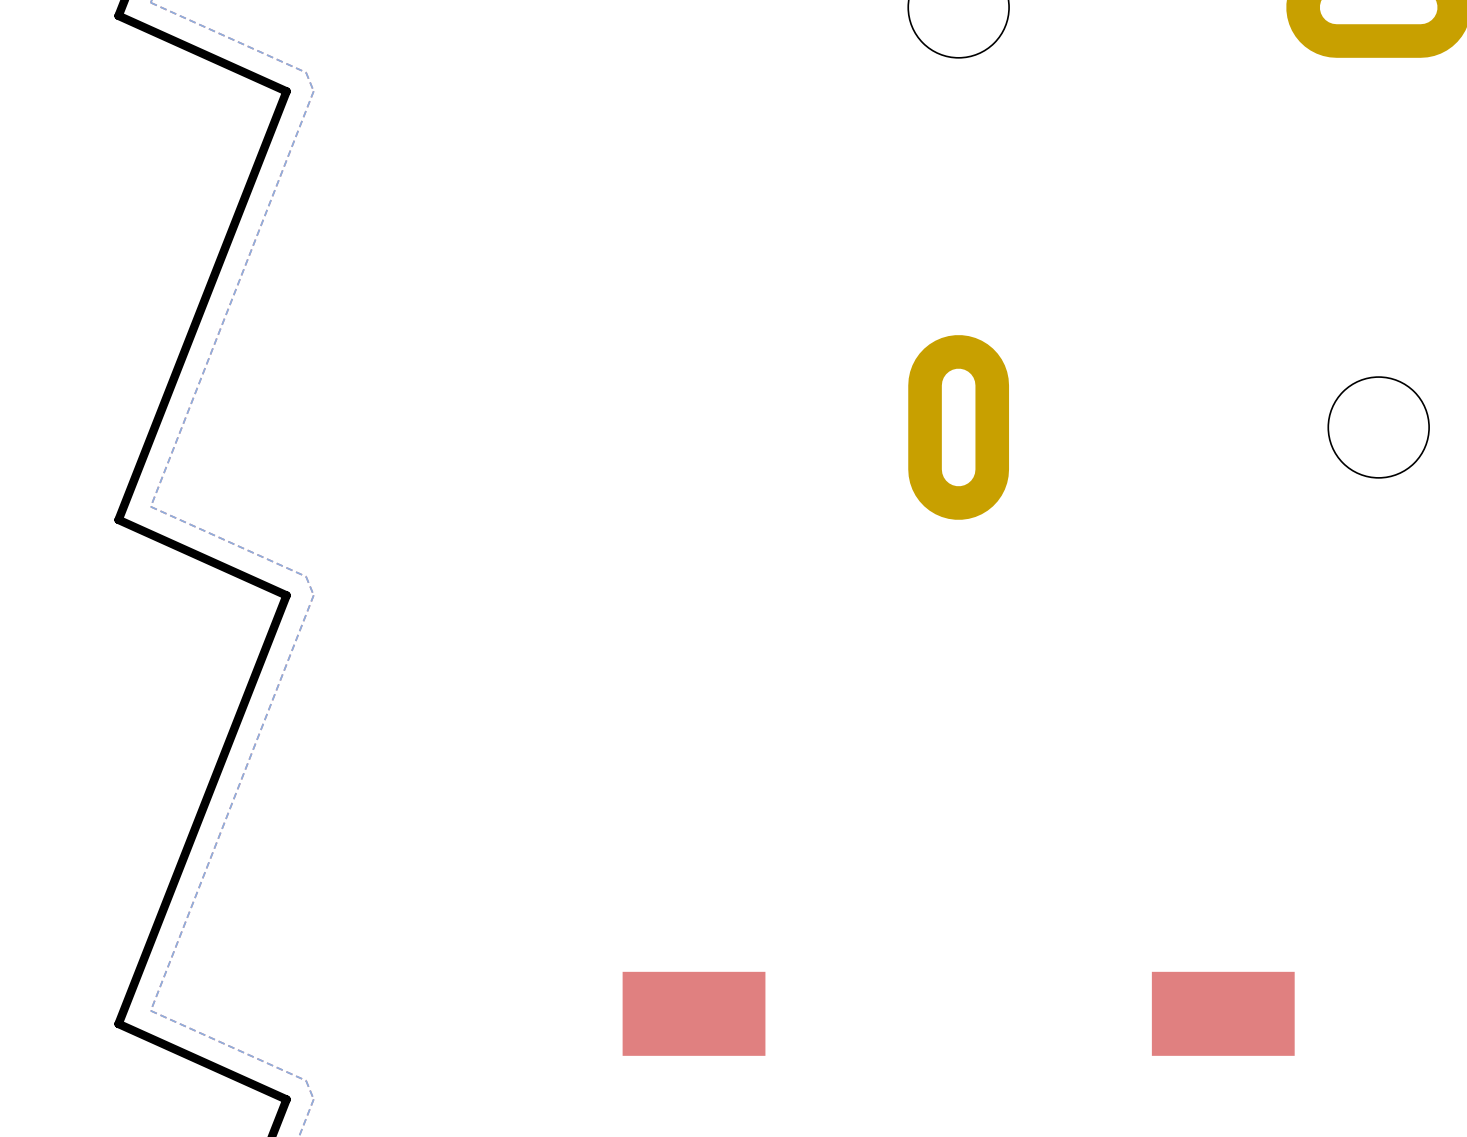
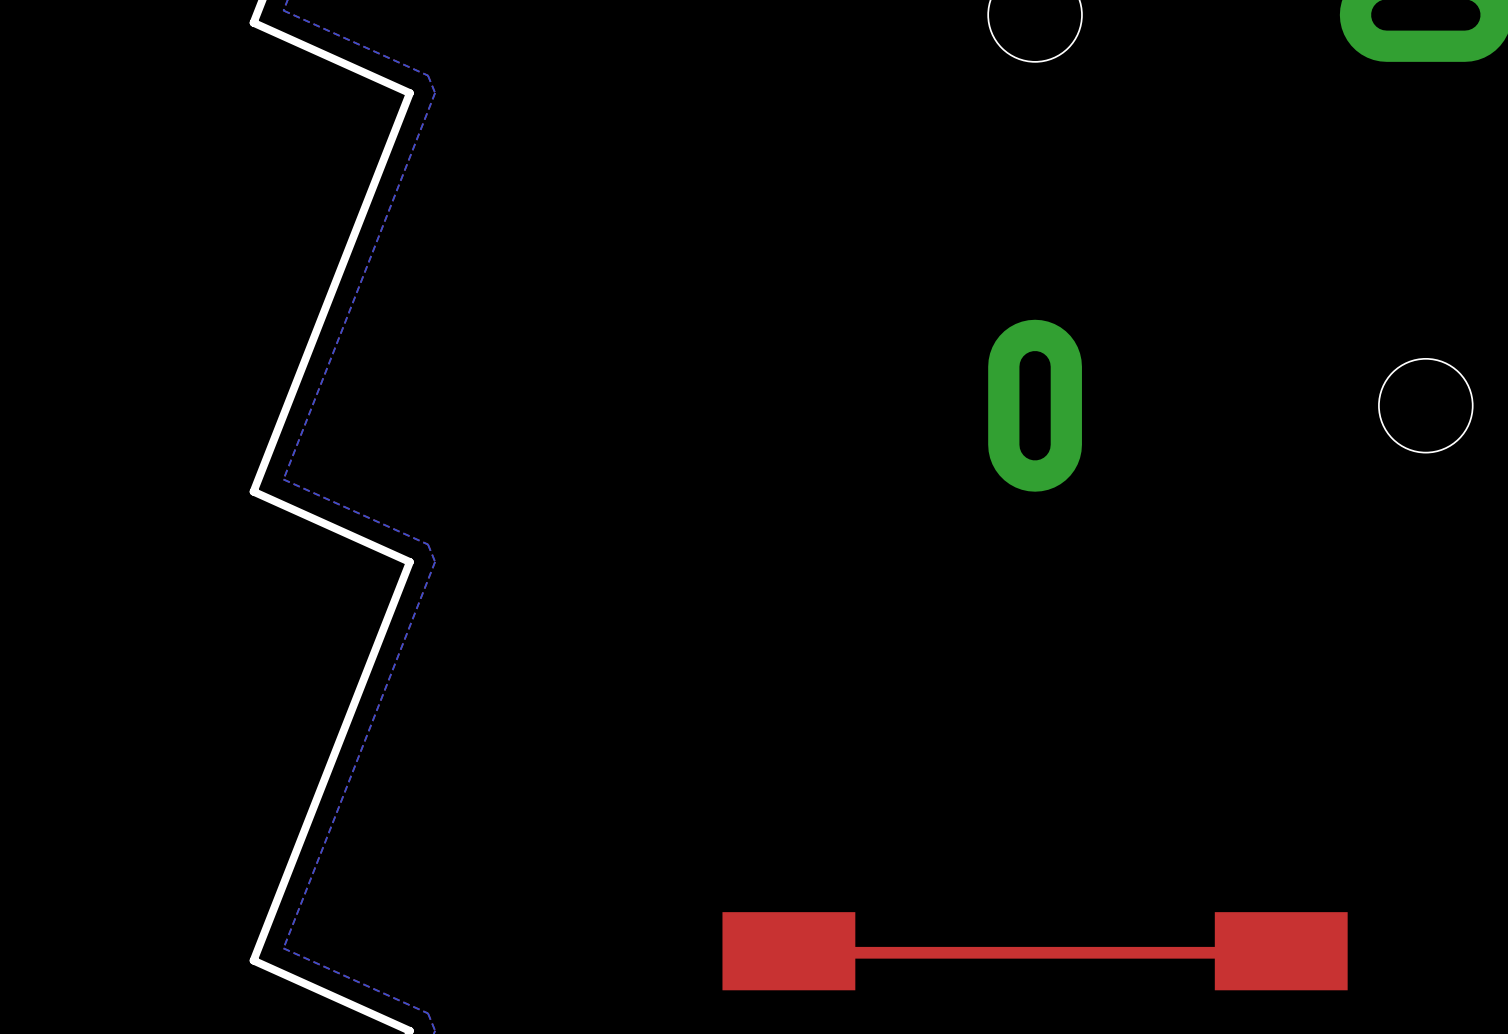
top track: none -> (1281, 951) (1285, 952) (784, 952) (788, 951)

